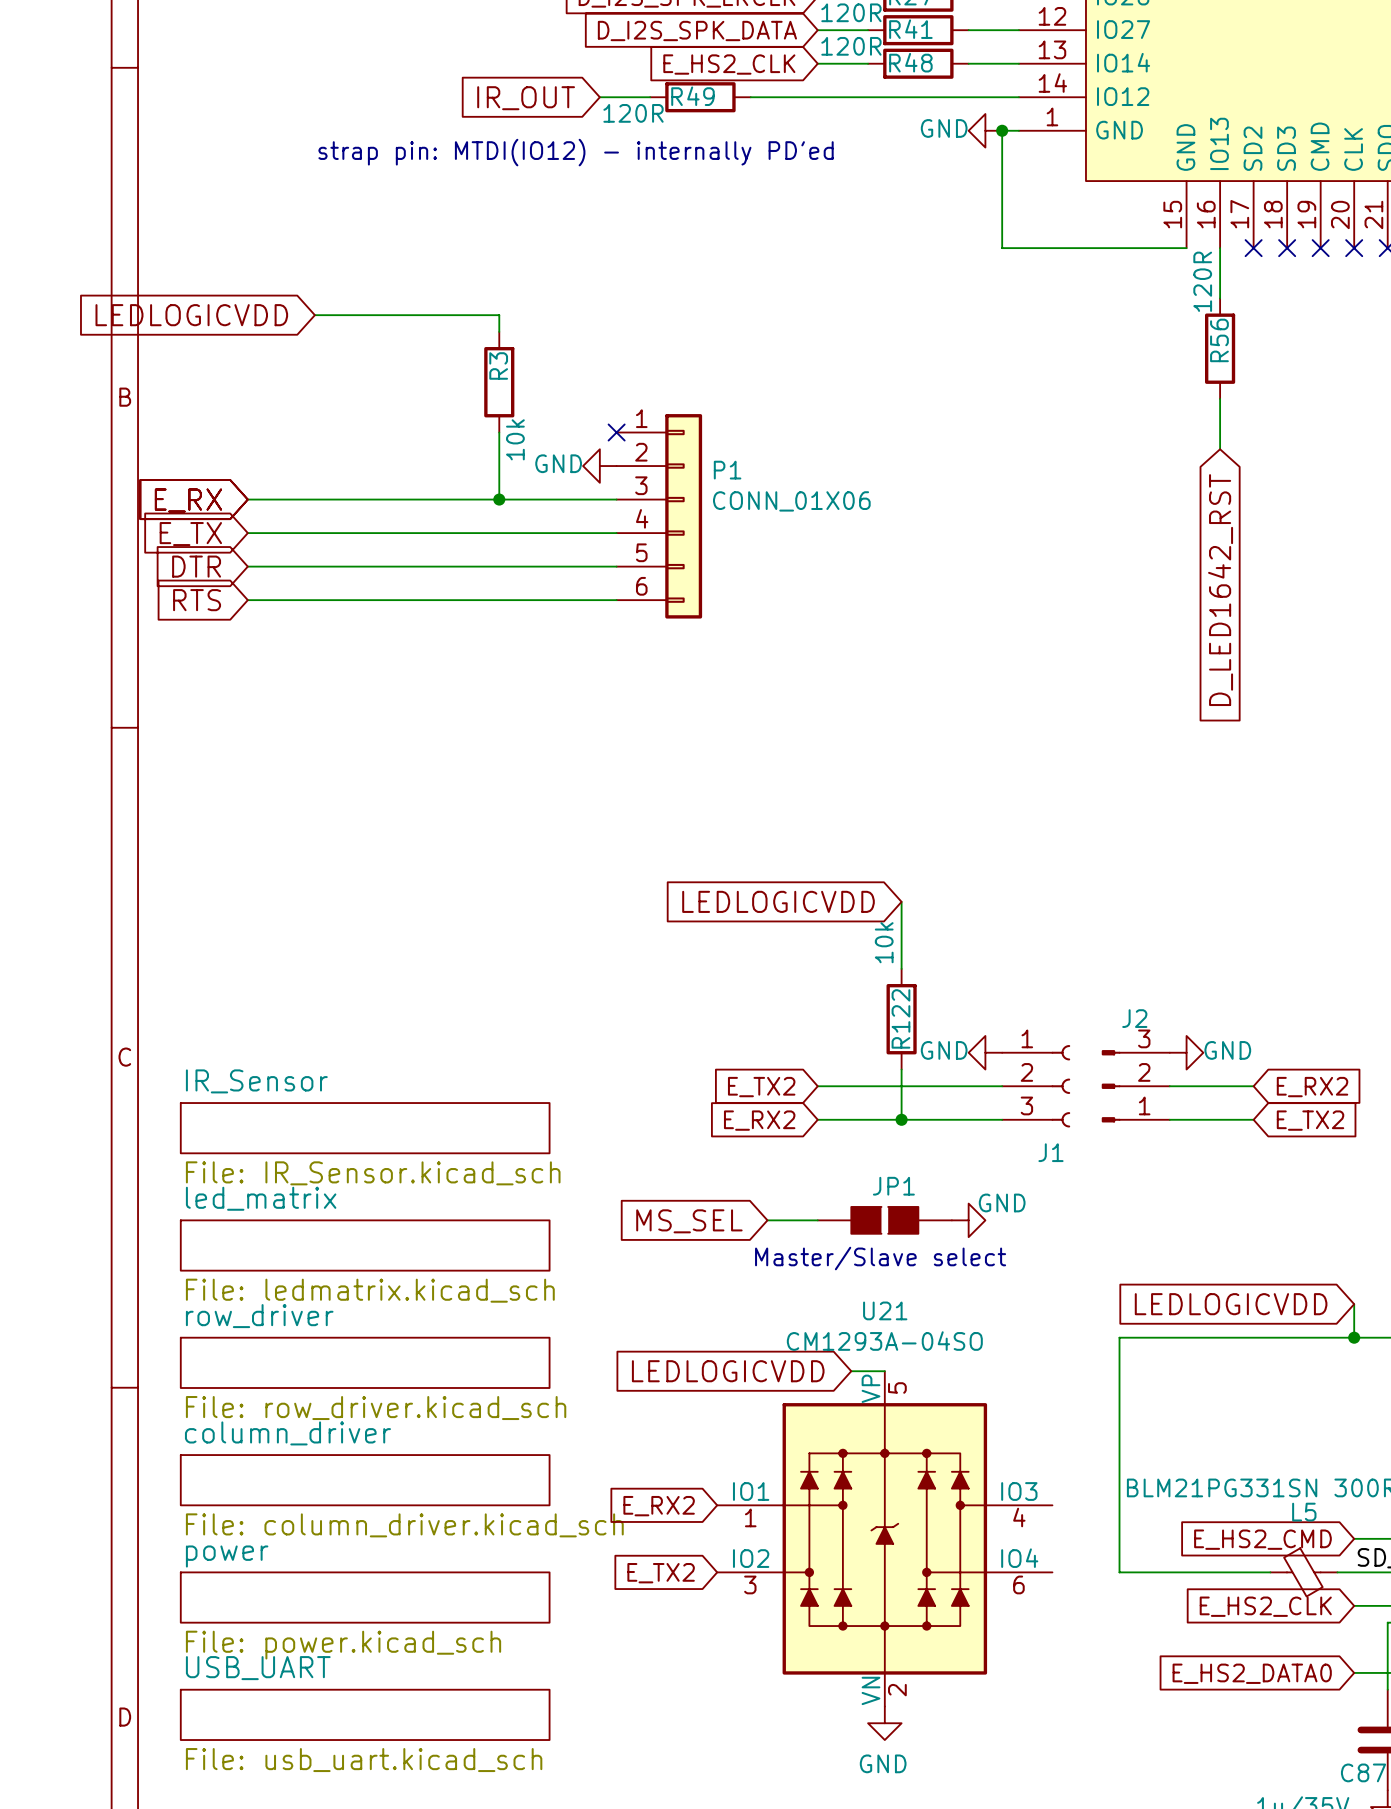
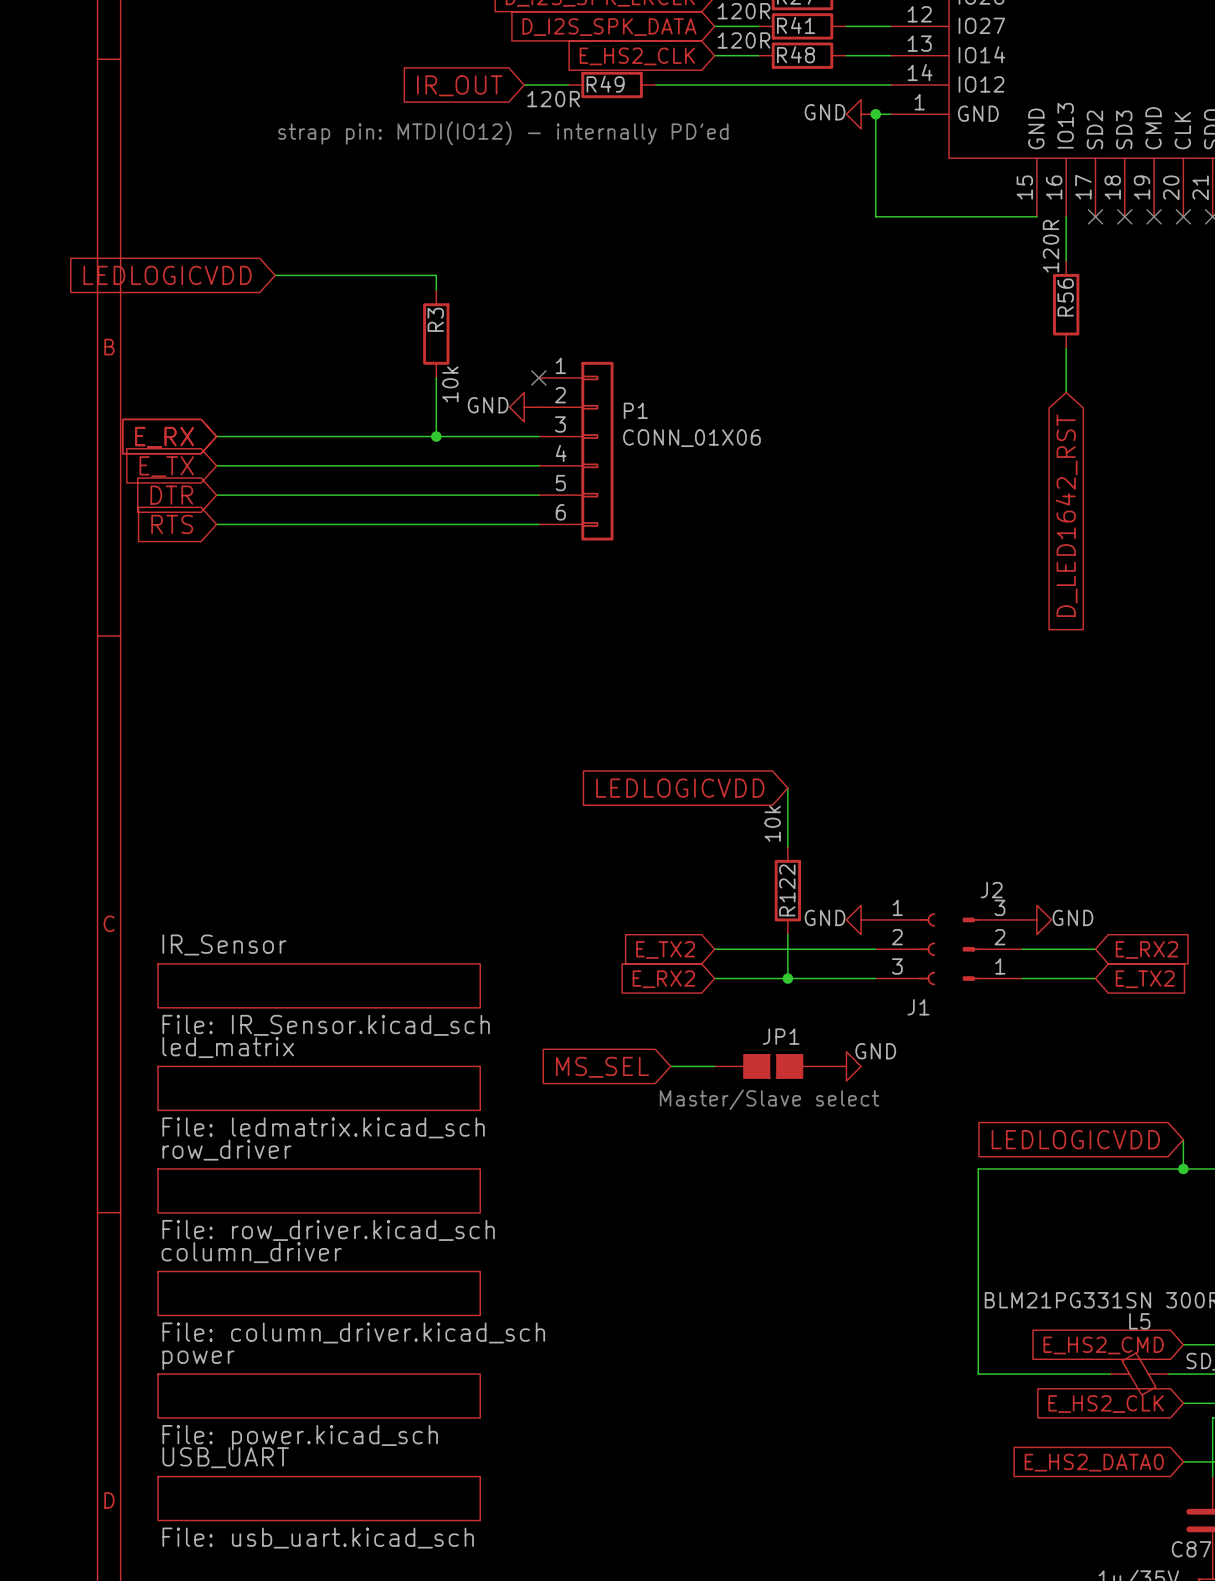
global label: LEDLOGICVDD (728, 1371) -> none
wire: (851, 1371) (884, 1371) -> none
global label: E_RX2 (659, 1506) -> none
U21: CM1293A-04SO (884, 1538) -> none
global label: E_TX2 (661, 1573) -> none
power symbol: GND (884, 1723) -> none

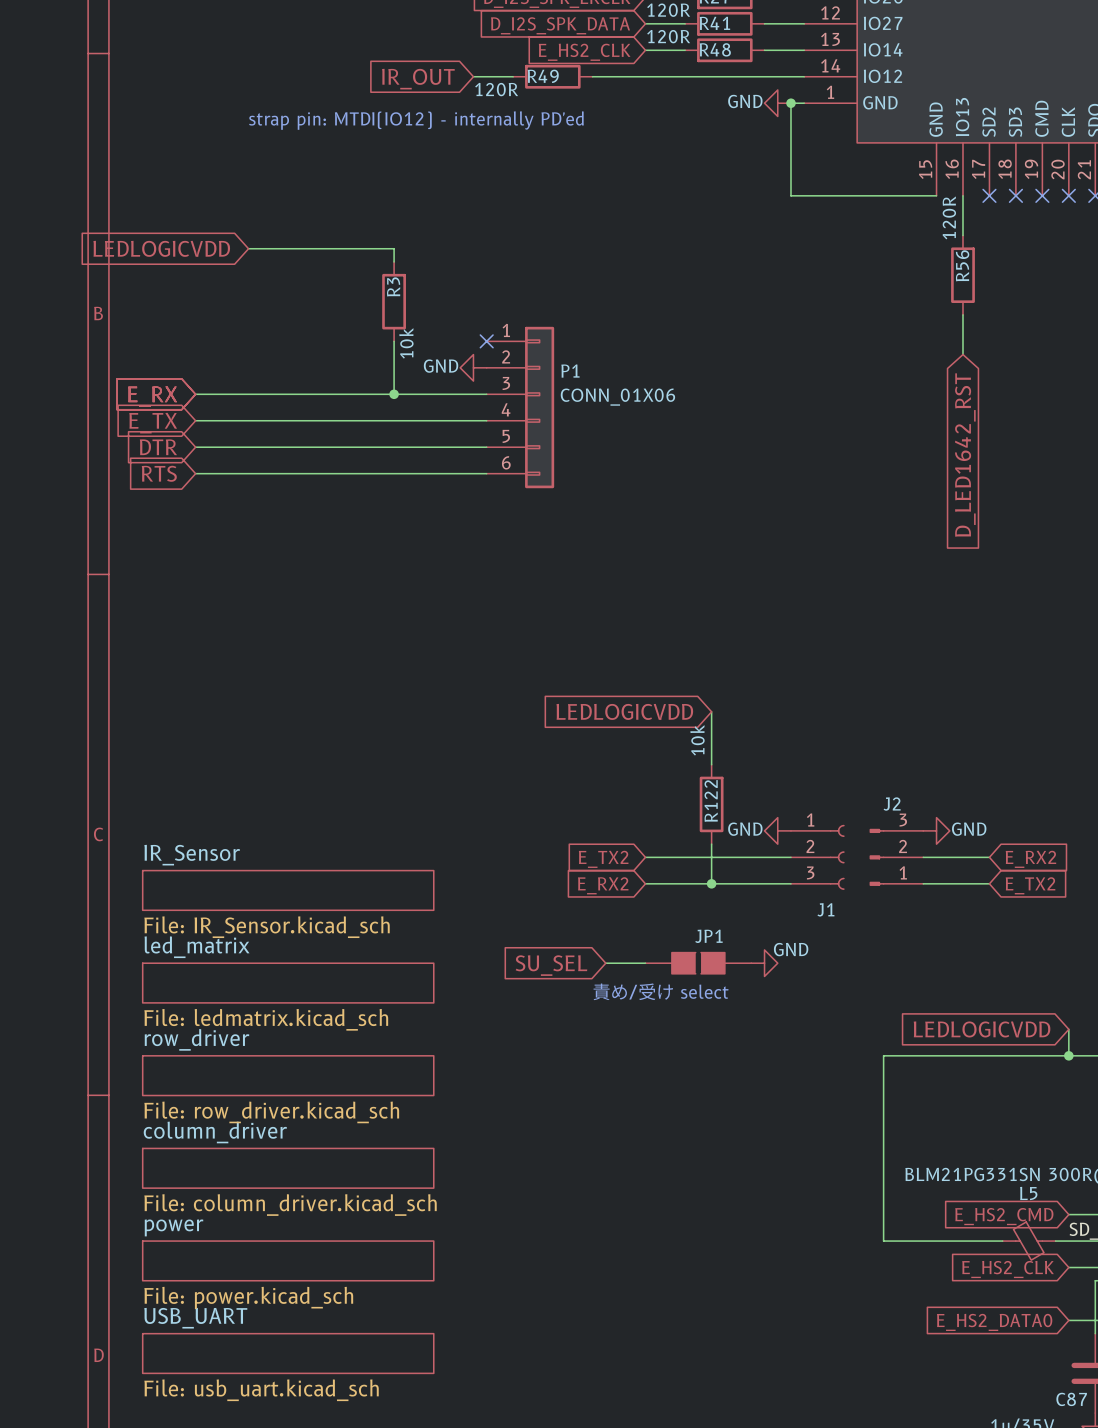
global label: MS_SEL (602, 1067) -> SU_SEL (551, 965)
text: Master/Slave select (769, 1099) -> 責め/受け select (661, 991)

